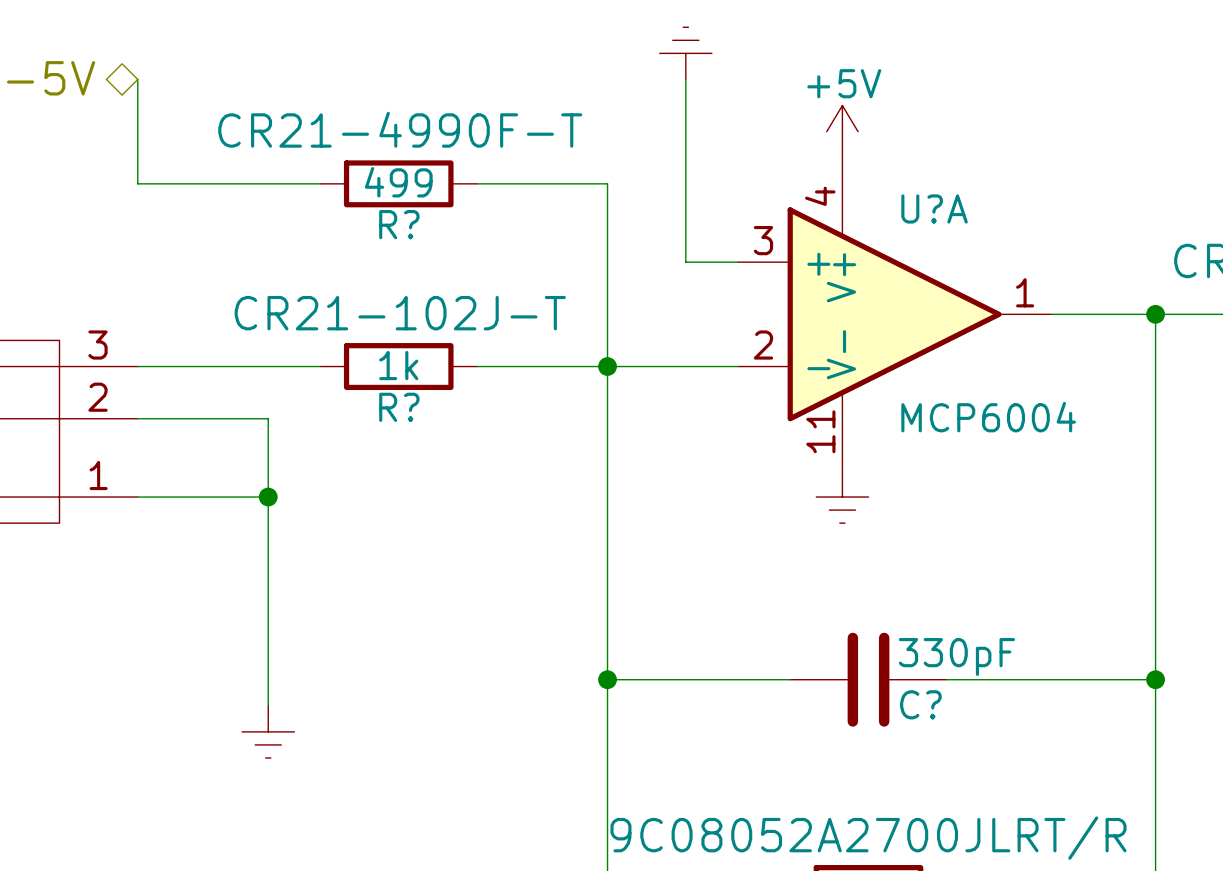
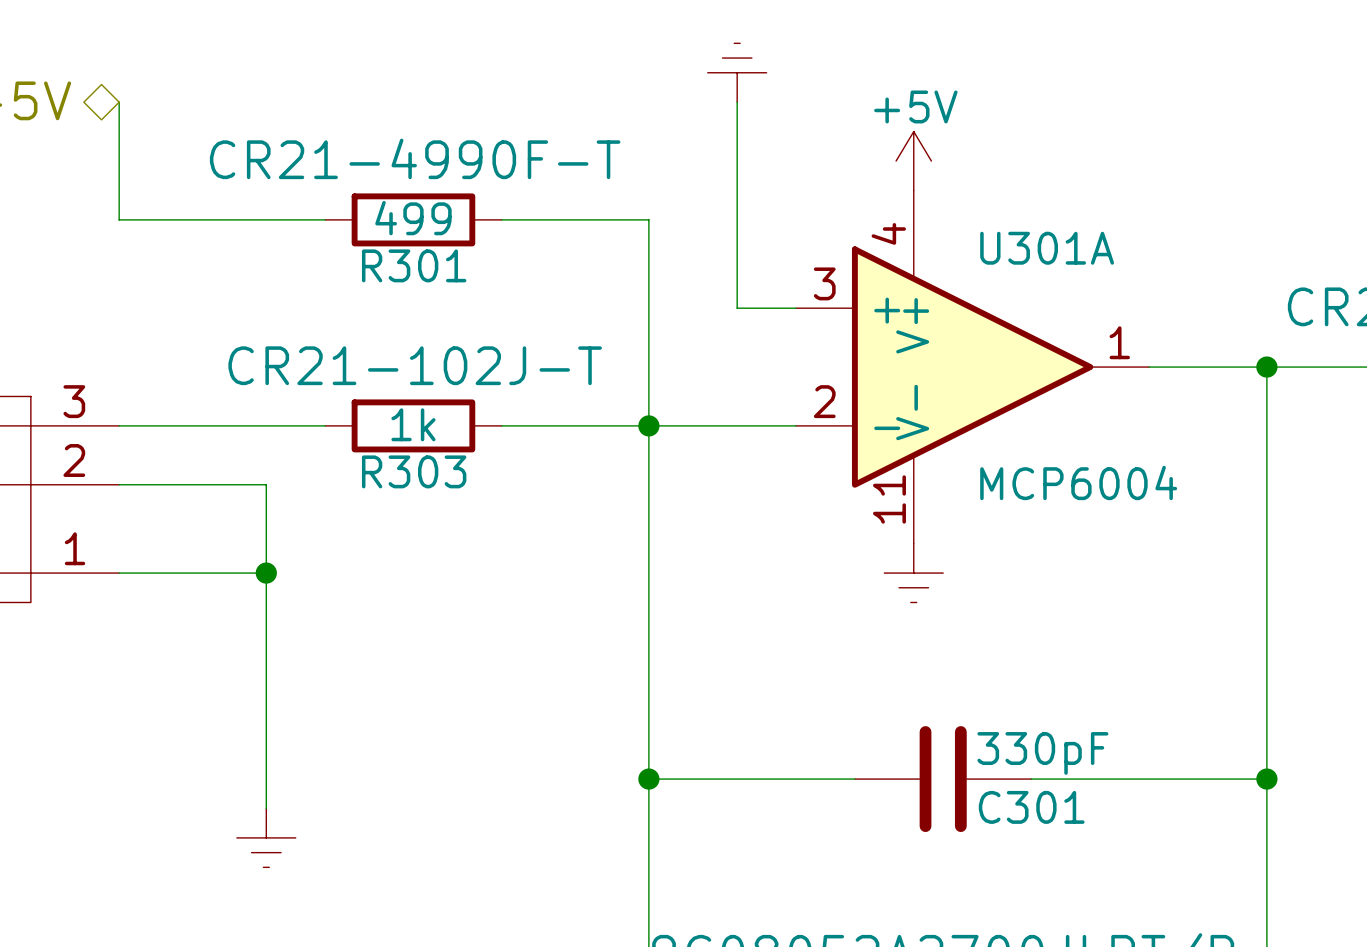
U?A name: U?A (934, 208) -> U301A (1047, 248)
R? name: R? (399, 224) -> R301 (414, 265)
R? name: R? (399, 407) -> R303 (414, 471)
C? name: C? (920, 704) -> C301 (1031, 807)

